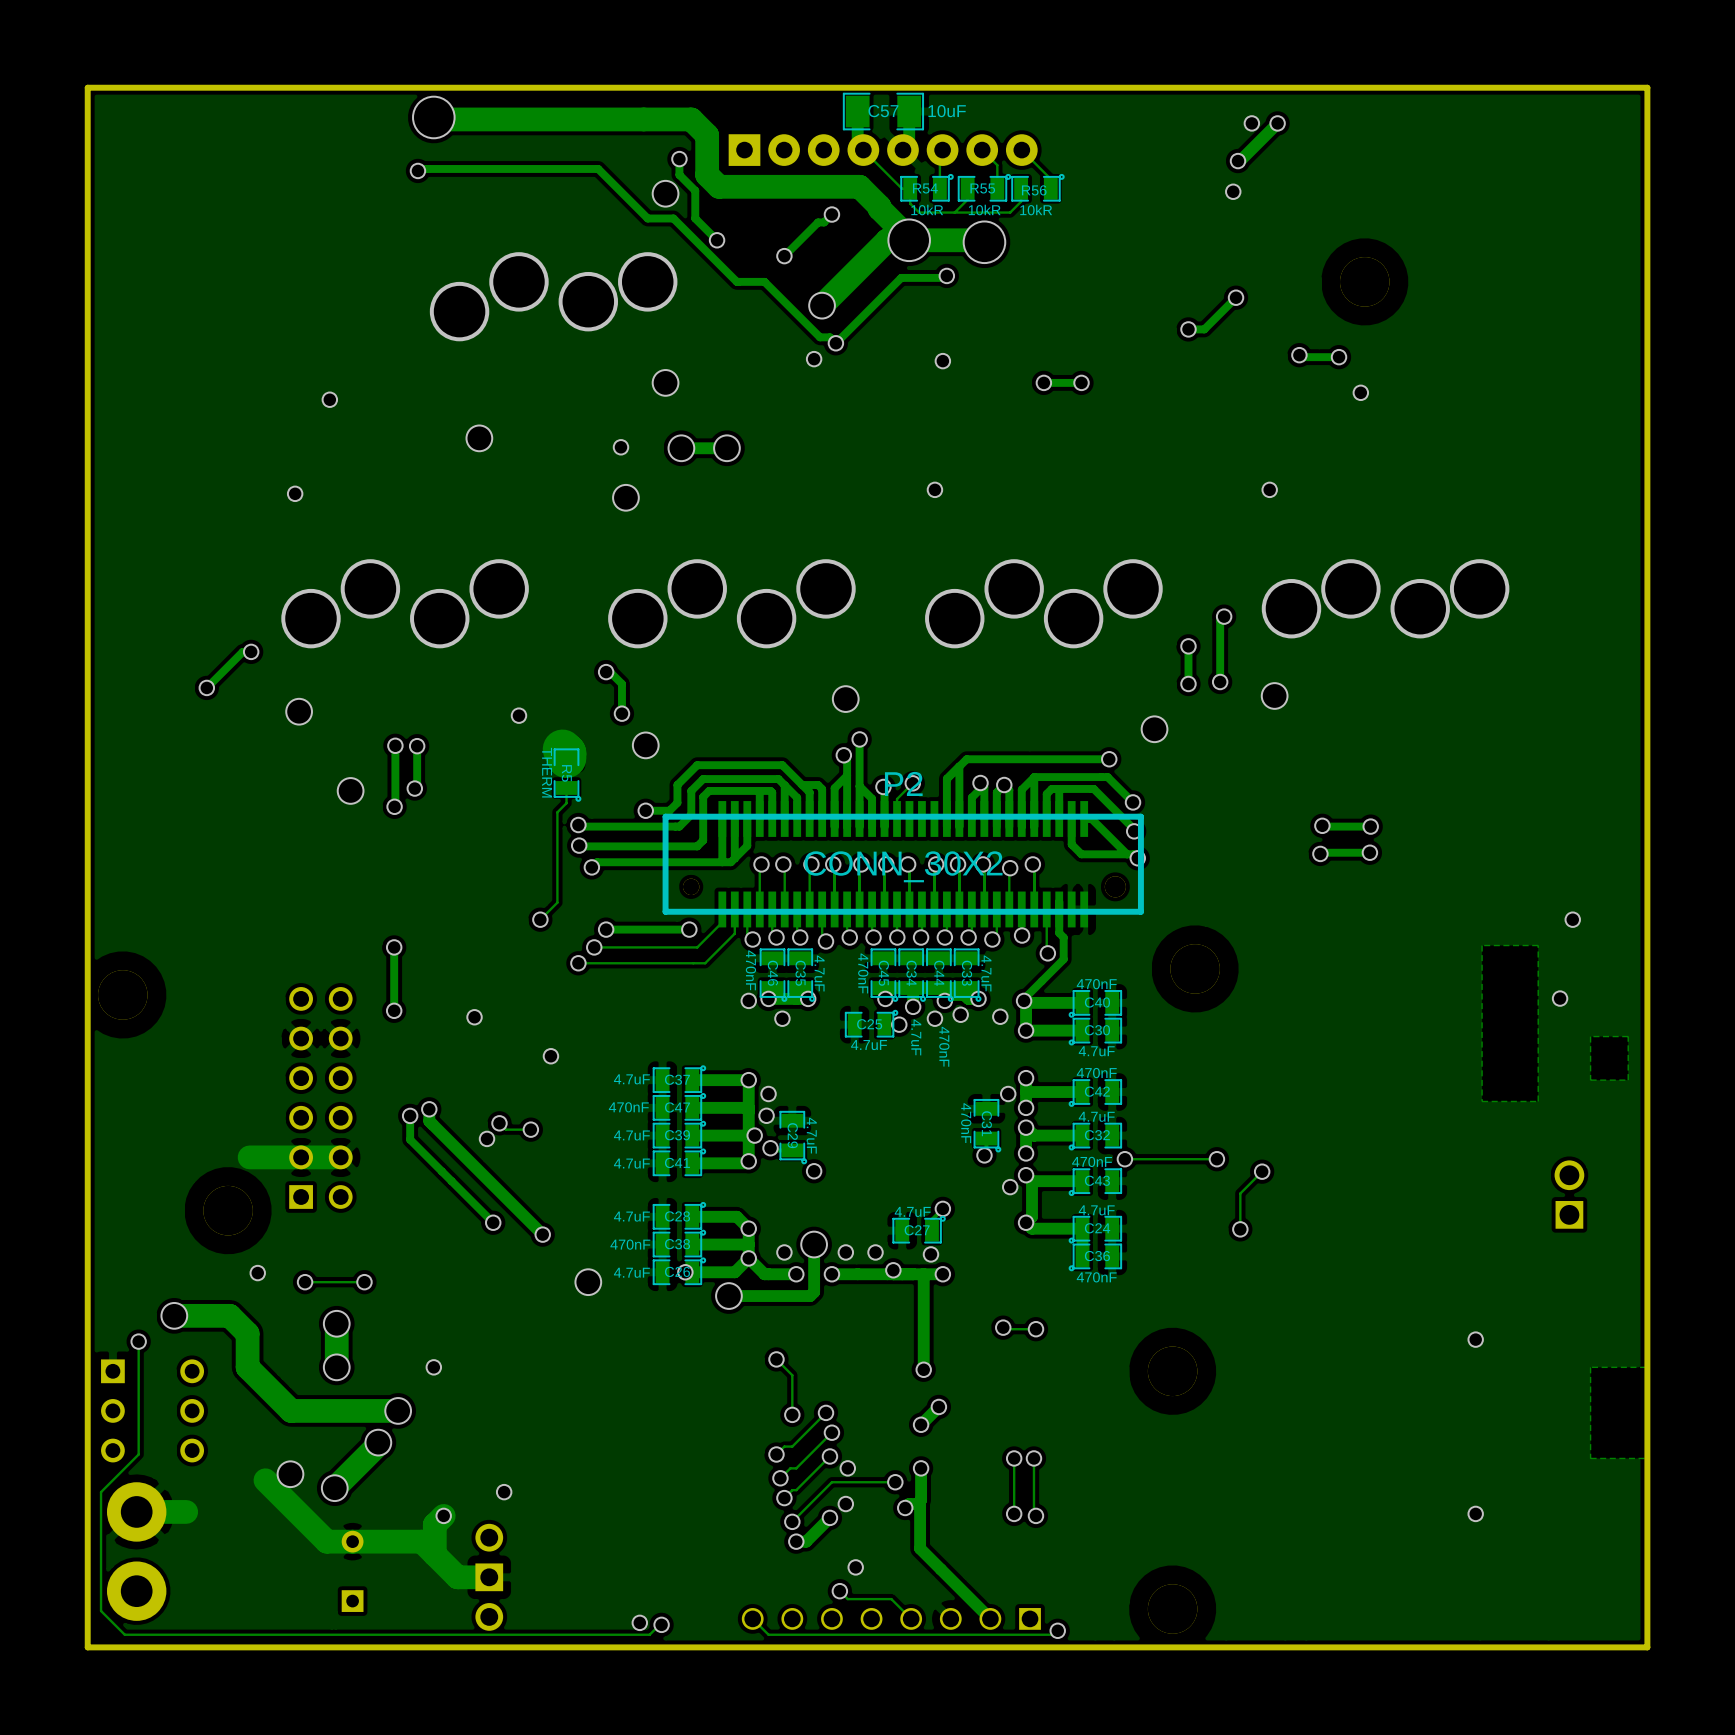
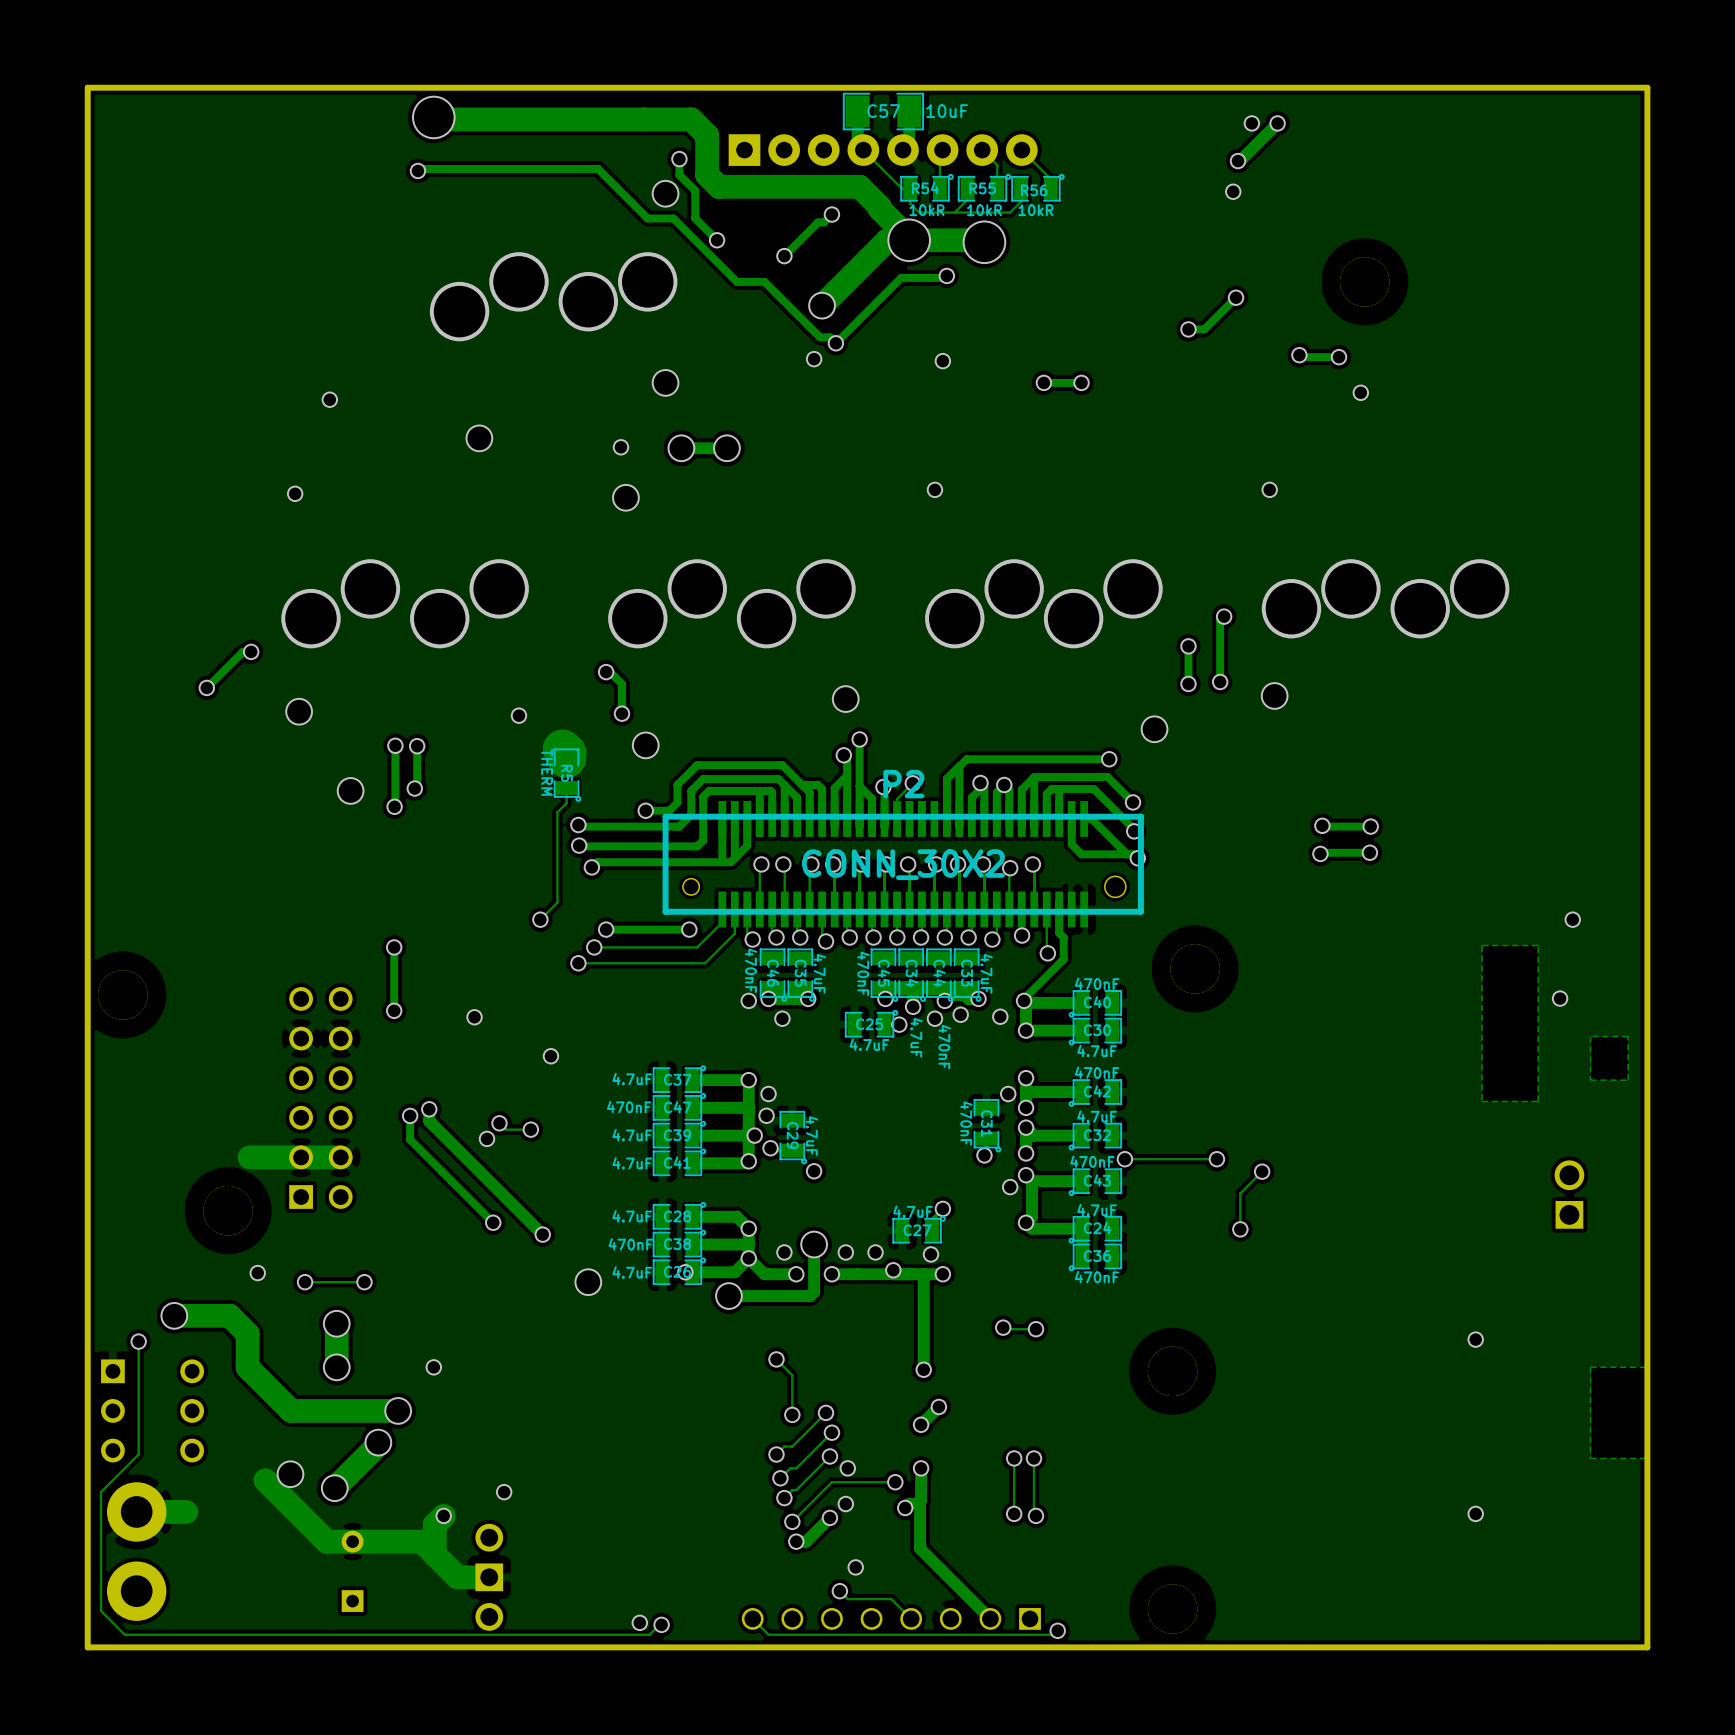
P2 footprint: [662, 801, 1144, 928] -> [662, 801, 1144, 928]

